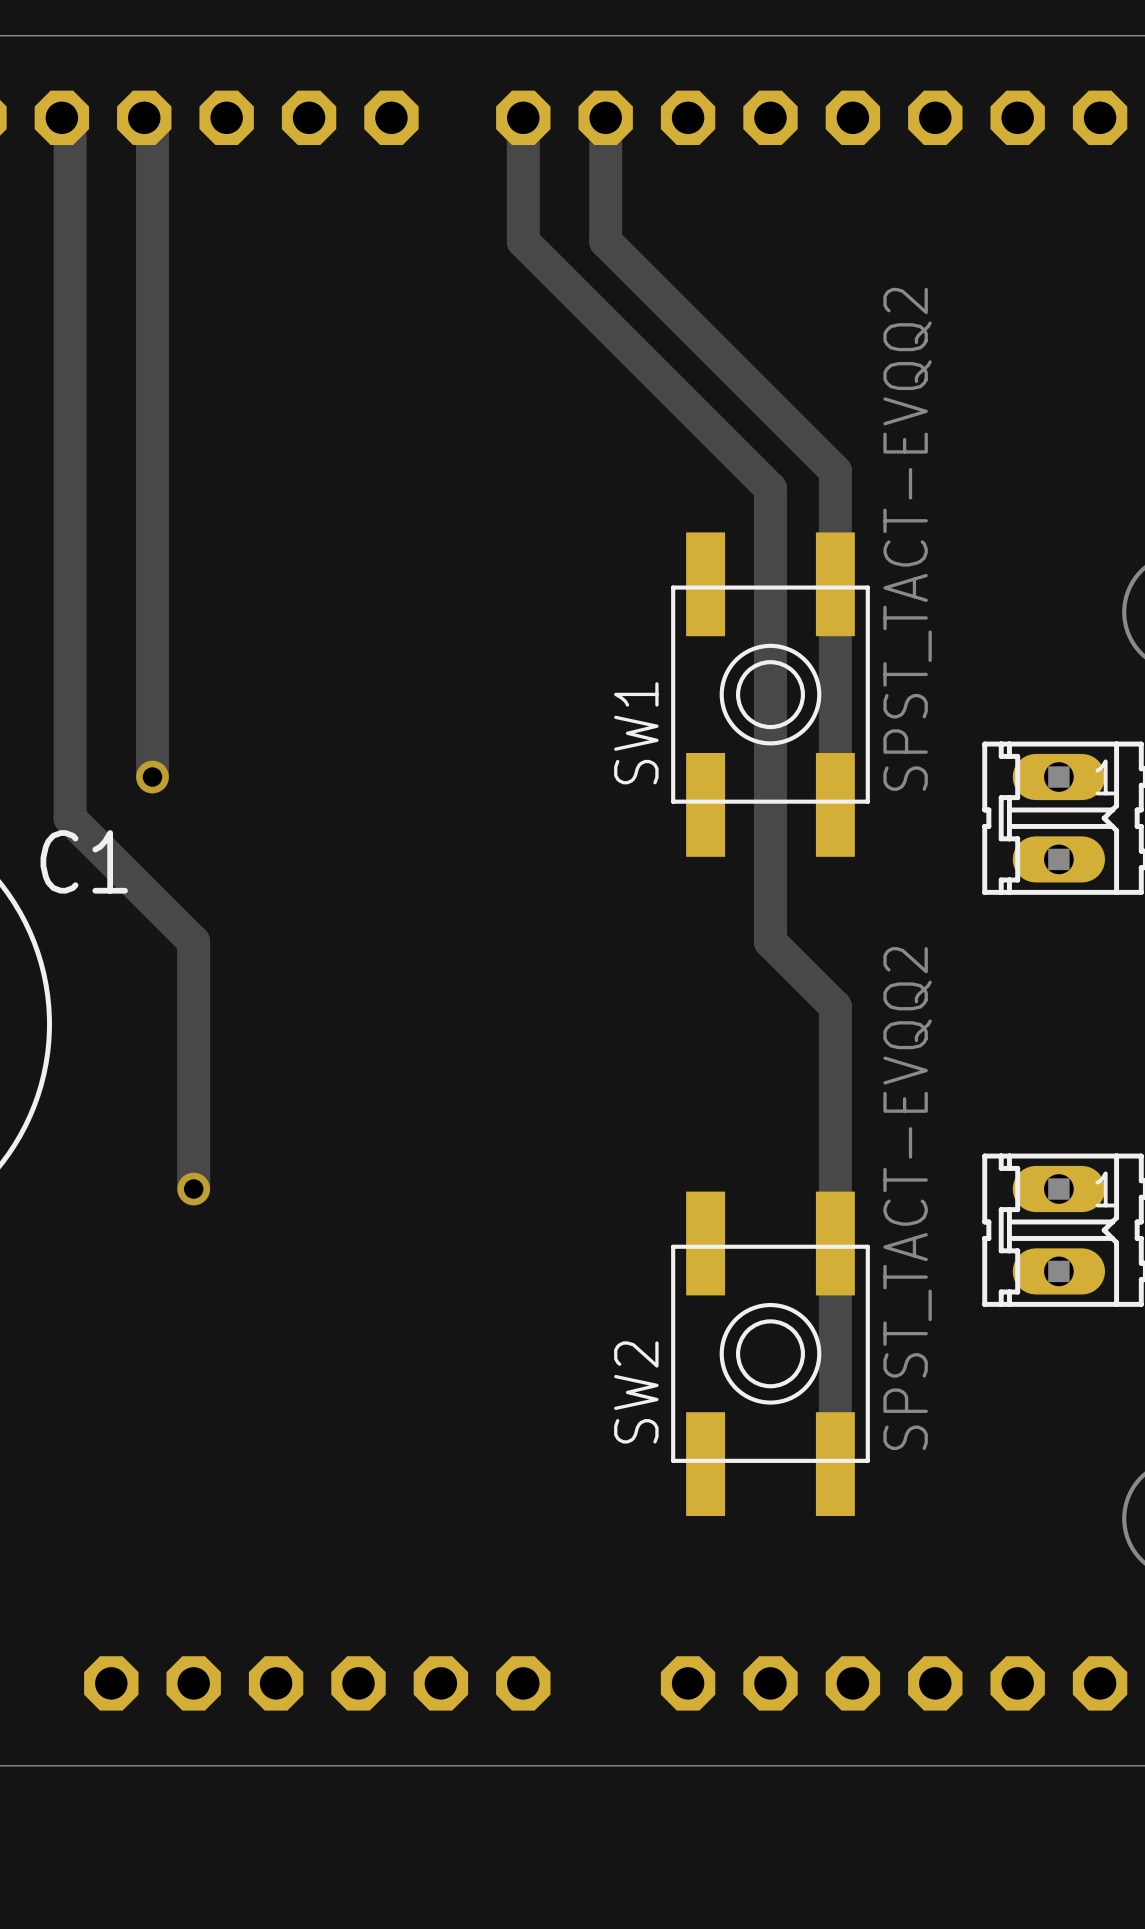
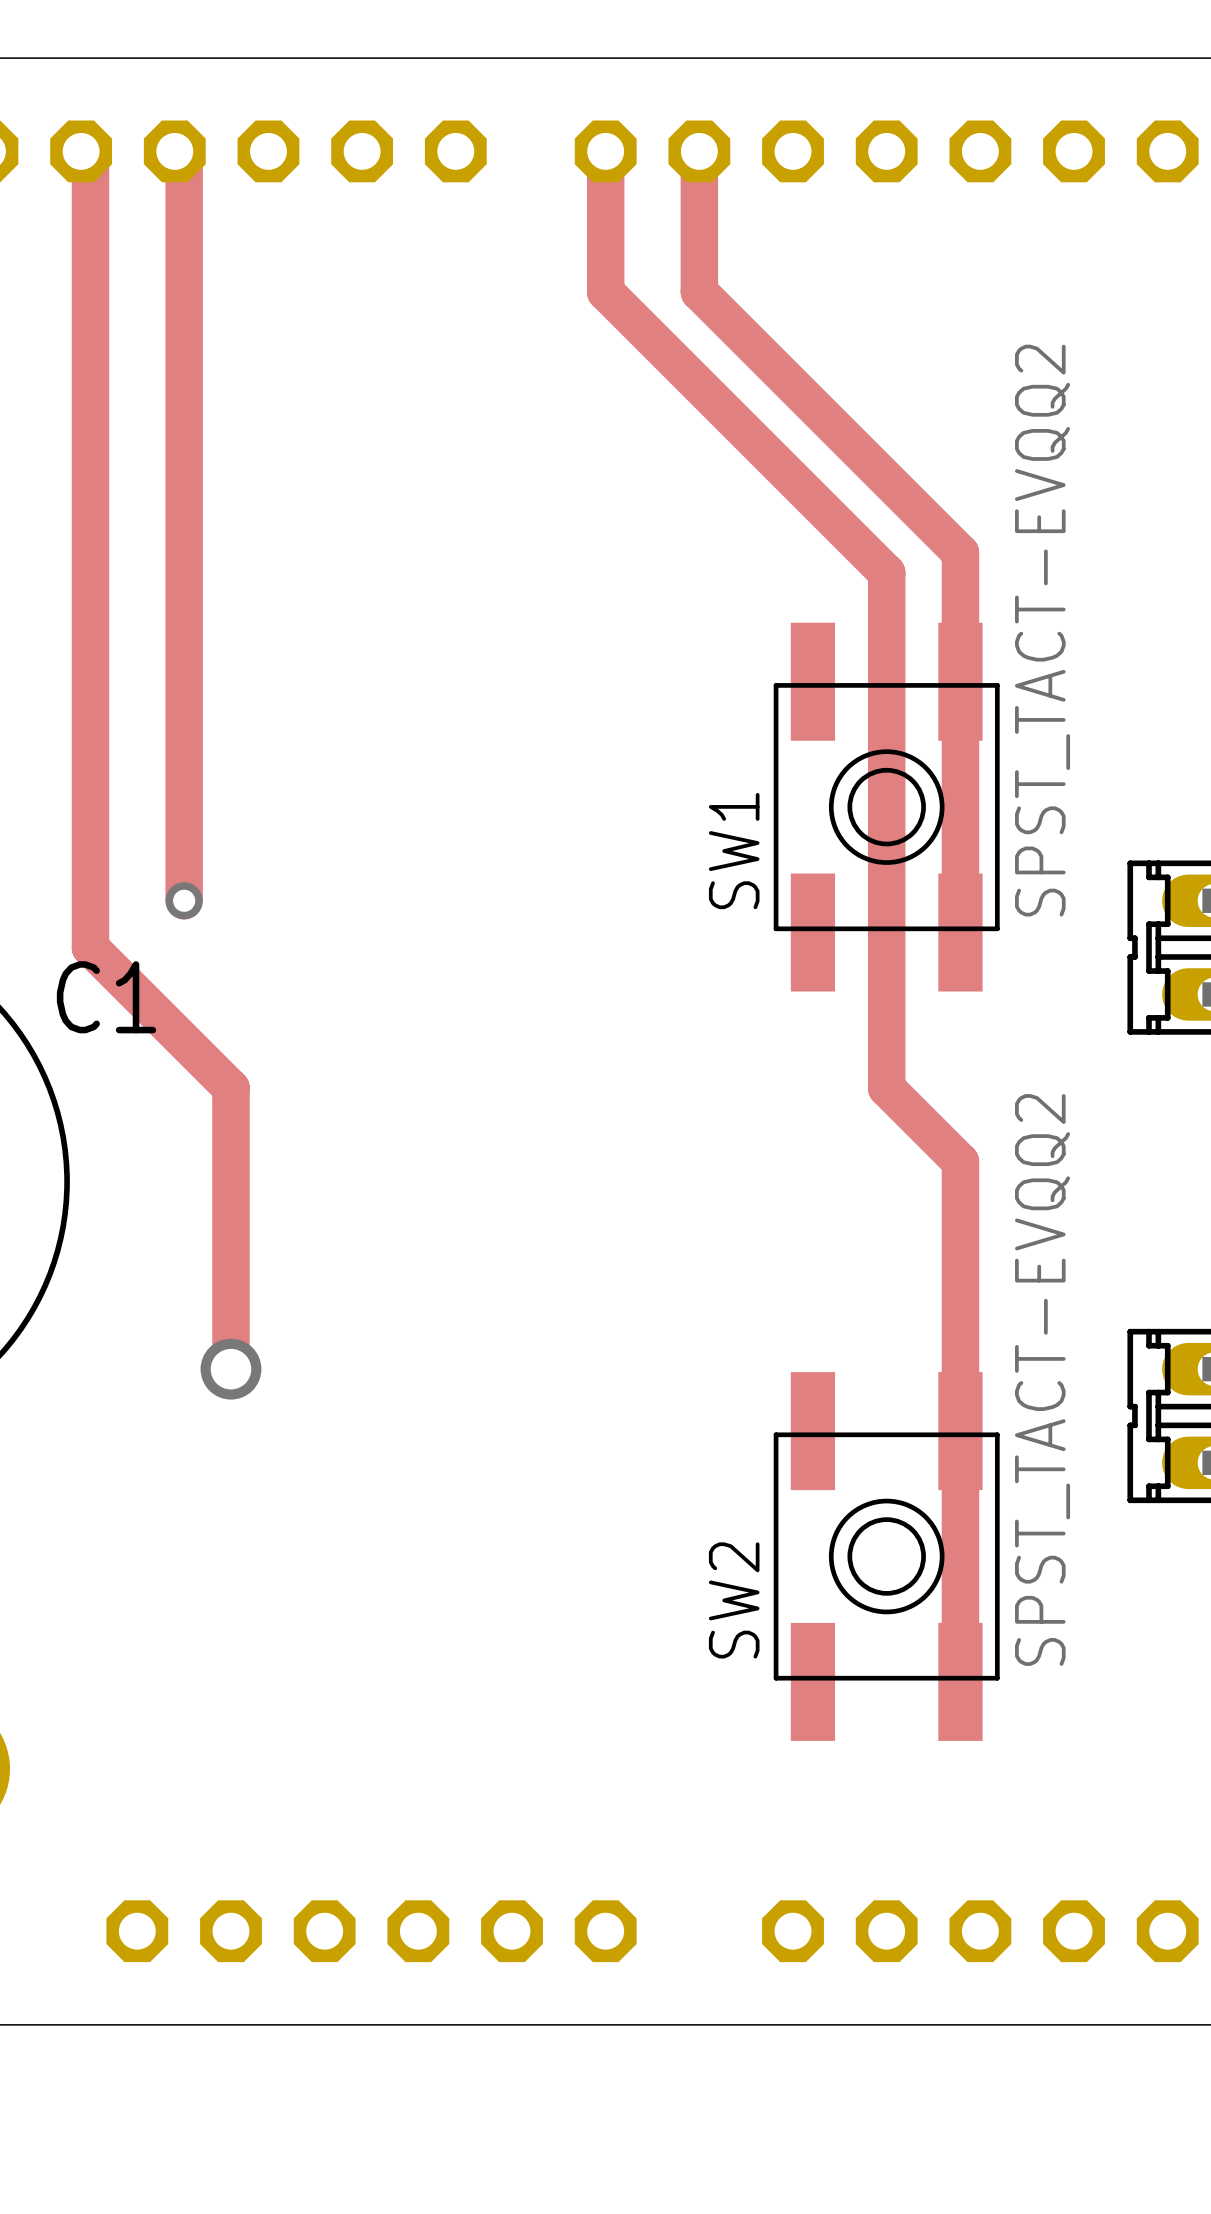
via size: [177, 1172, 211, 1206] -> [200, 1338, 262, 1400]

